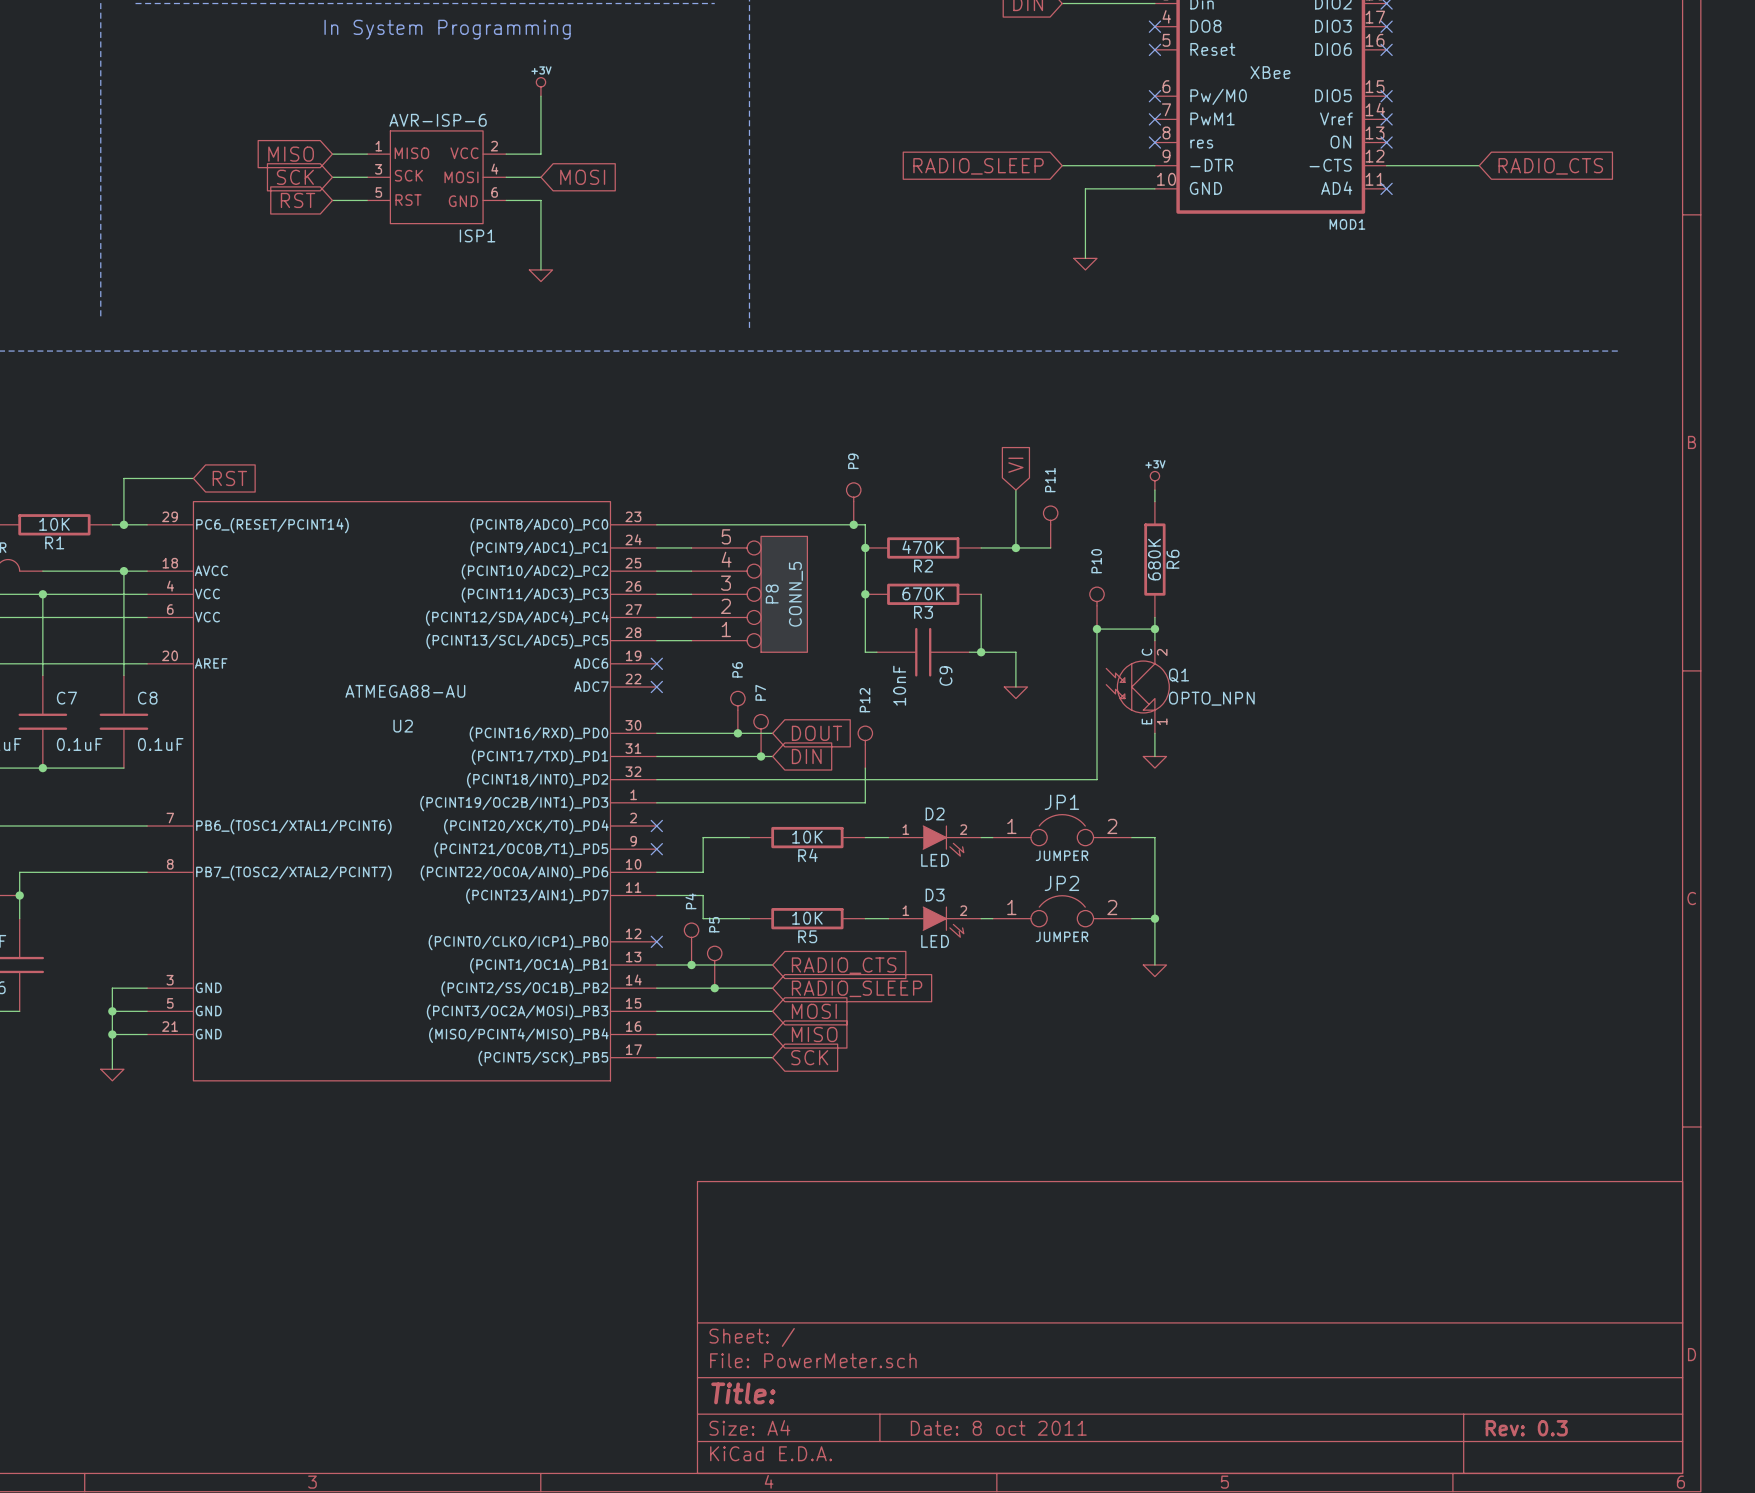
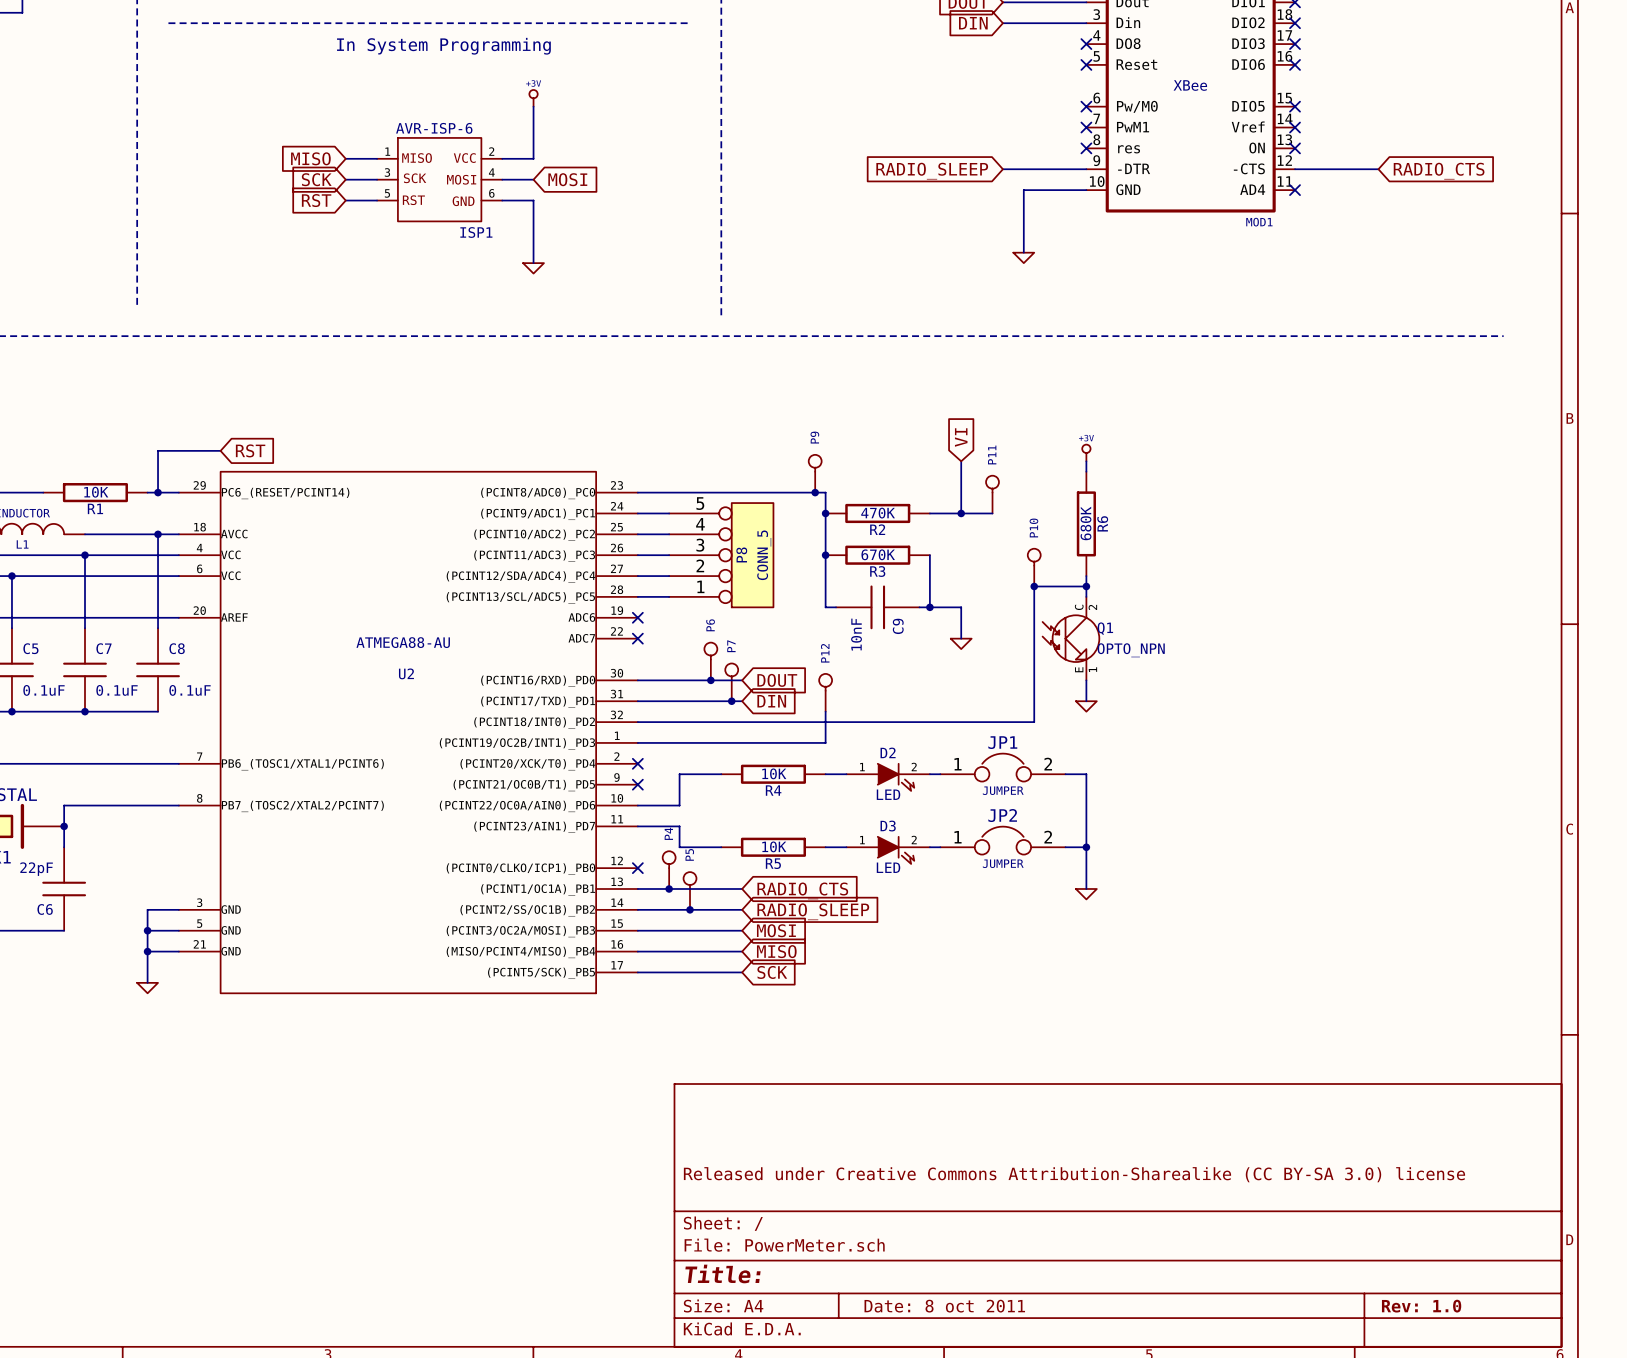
title block: none -> Released under Creative Commons Attribution-Sharealike (CC BY-SA 3.0) license (1074, 1174)
title block: Rev: 0.3 (1526, 1428) -> Rev: 1.0 (1421, 1306)

